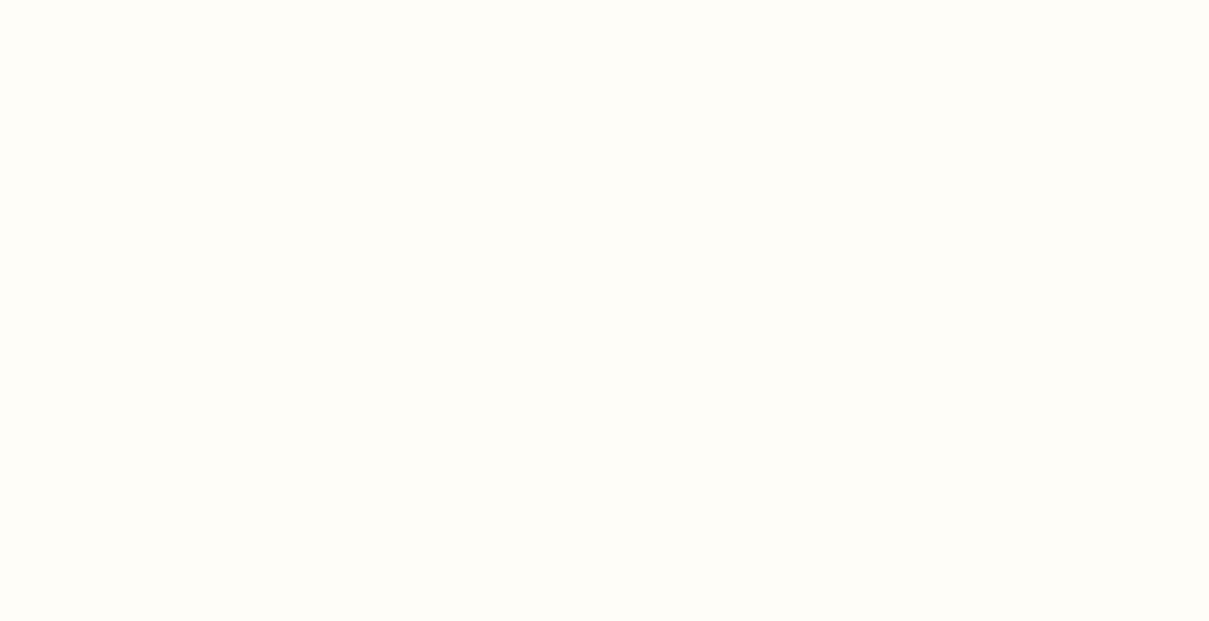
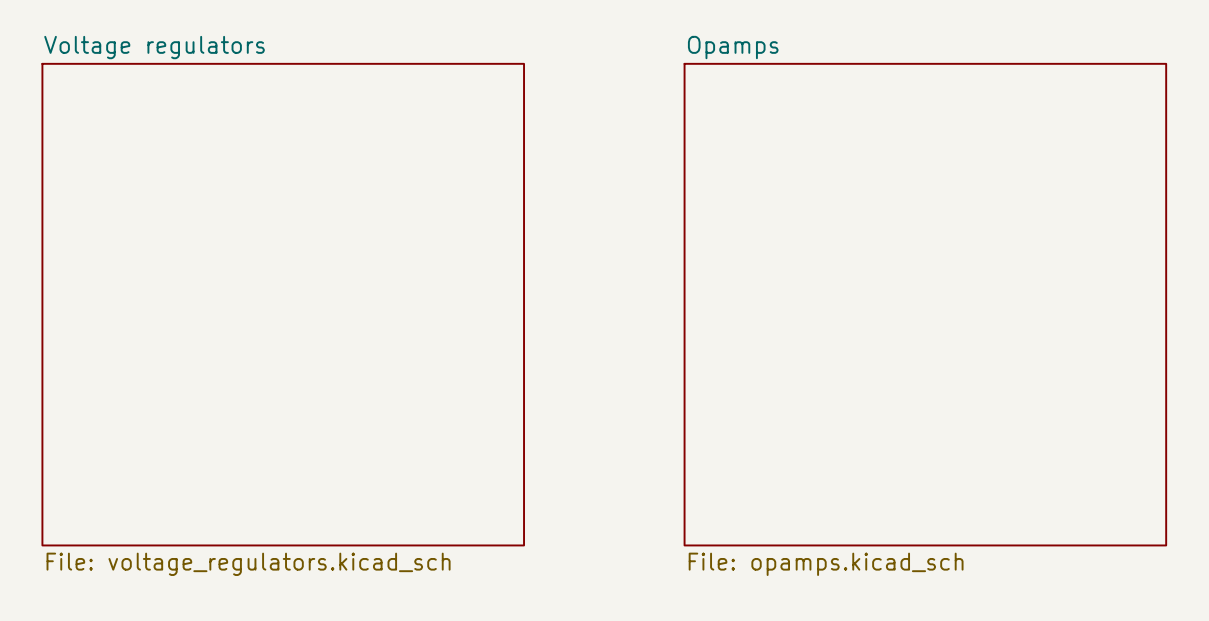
sheet Voltage regulators: none -> File: voltage_regulators.kicad_sch (283, 304)
sheet Opamps: none -> File: opamps.kicad_sch (925, 304)

